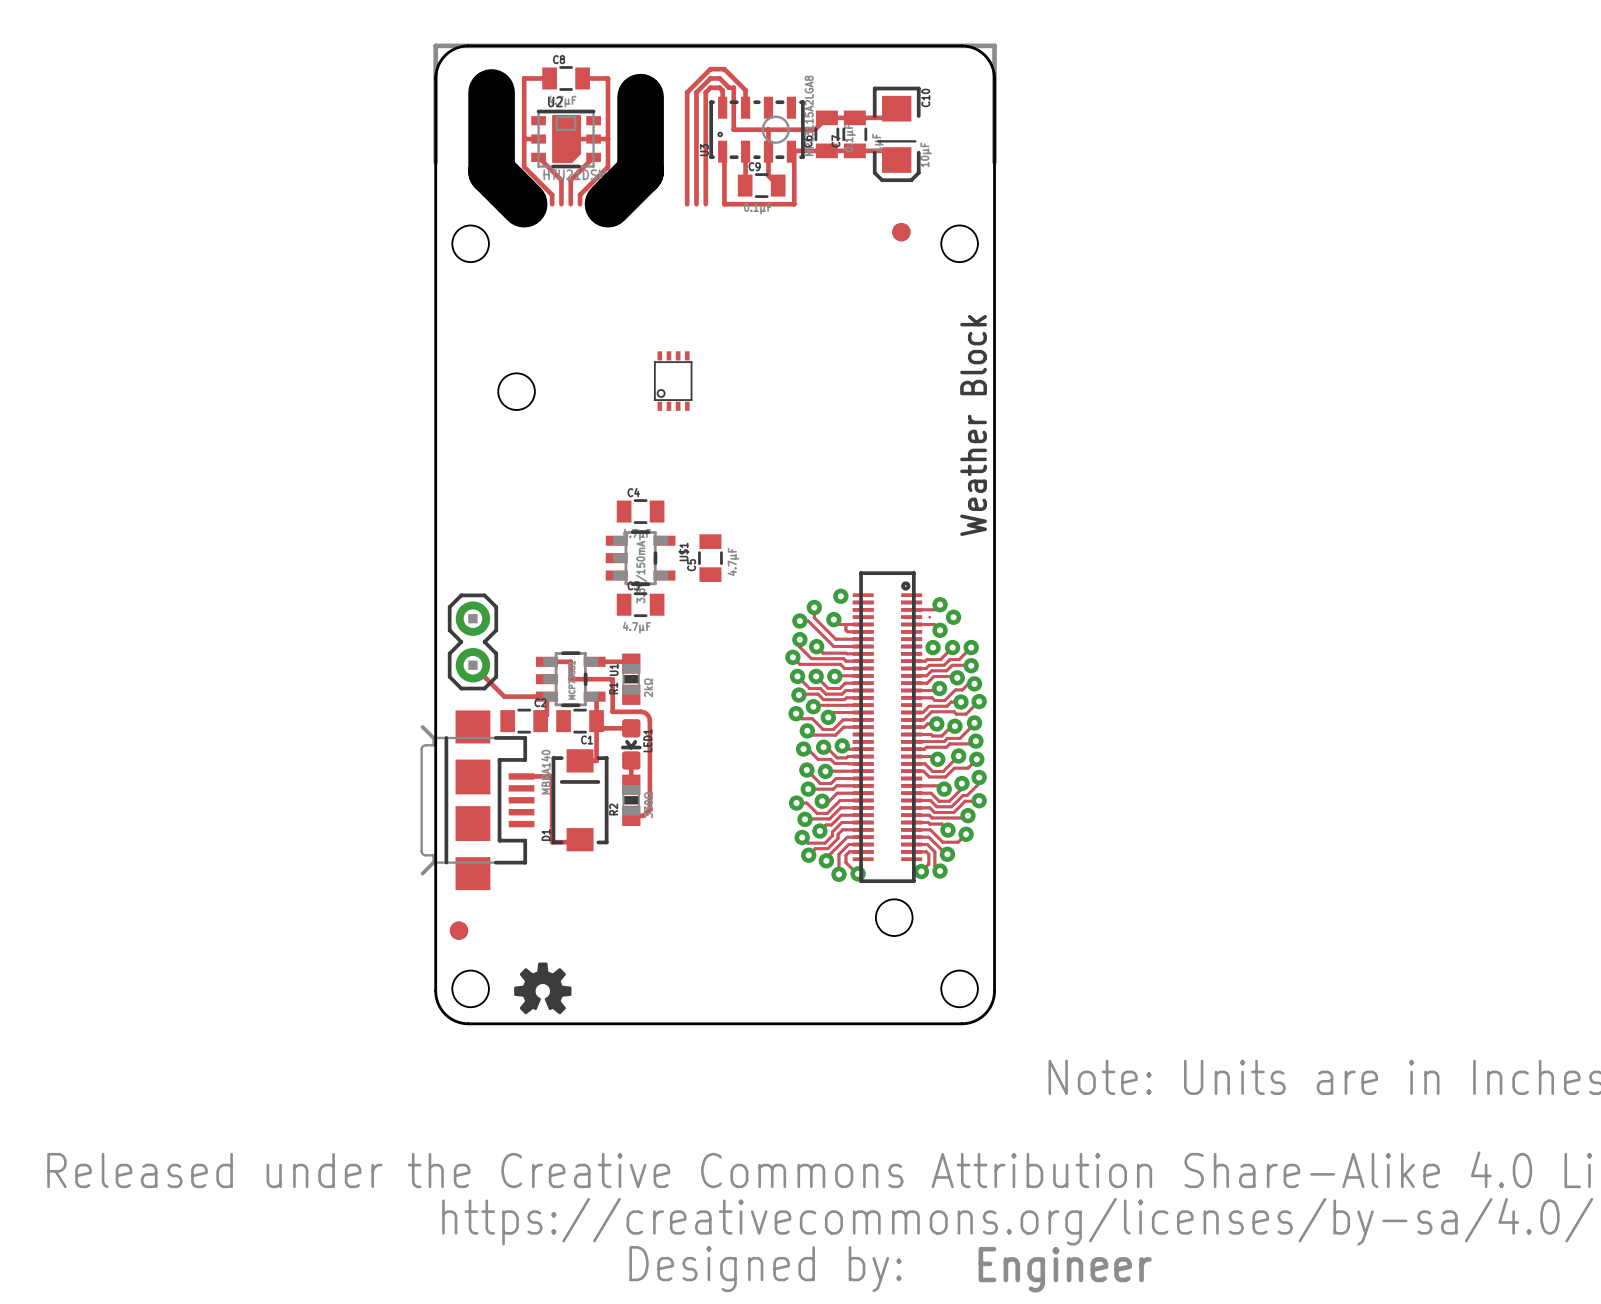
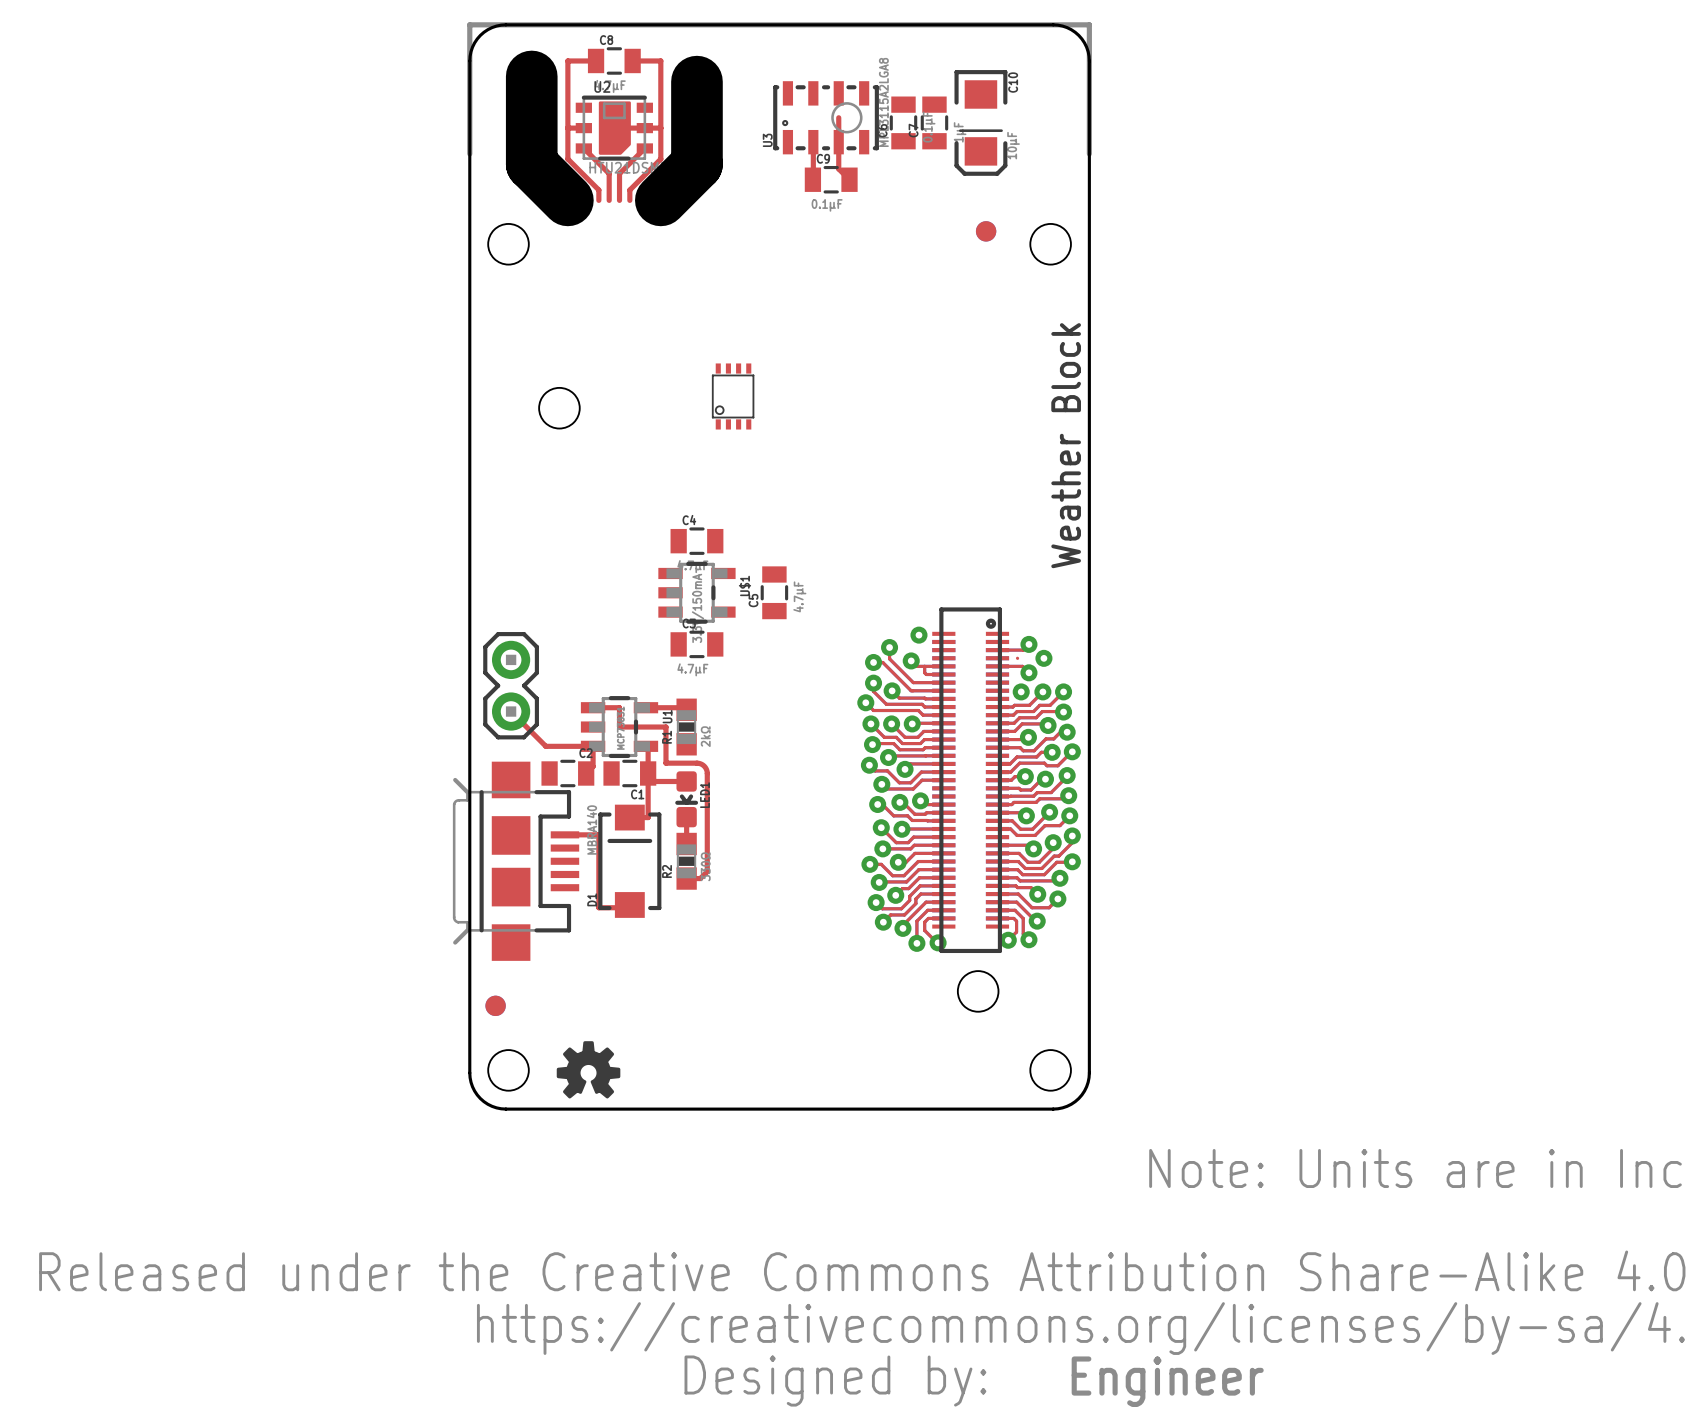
top track: (722, 107) (722, 90) (719, 87) (710, 87) (705, 92) (705, 204) -> none
top track: (745, 107) (745, 90) (724, 69) (710, 69) (687, 92) (687, 204) -> none
top track: (896, 108) (887, 117) (826, 117) (815, 129) (733, 129) (733, 87) (729, 87) (719, 78) (710, 78) (696, 92) (696, 204) -> none
top track: (722, 151) (724, 153) (724, 204) (794, 204) (794, 151) (792, 150) (888, 150) (894, 153) (896, 160) -> none

